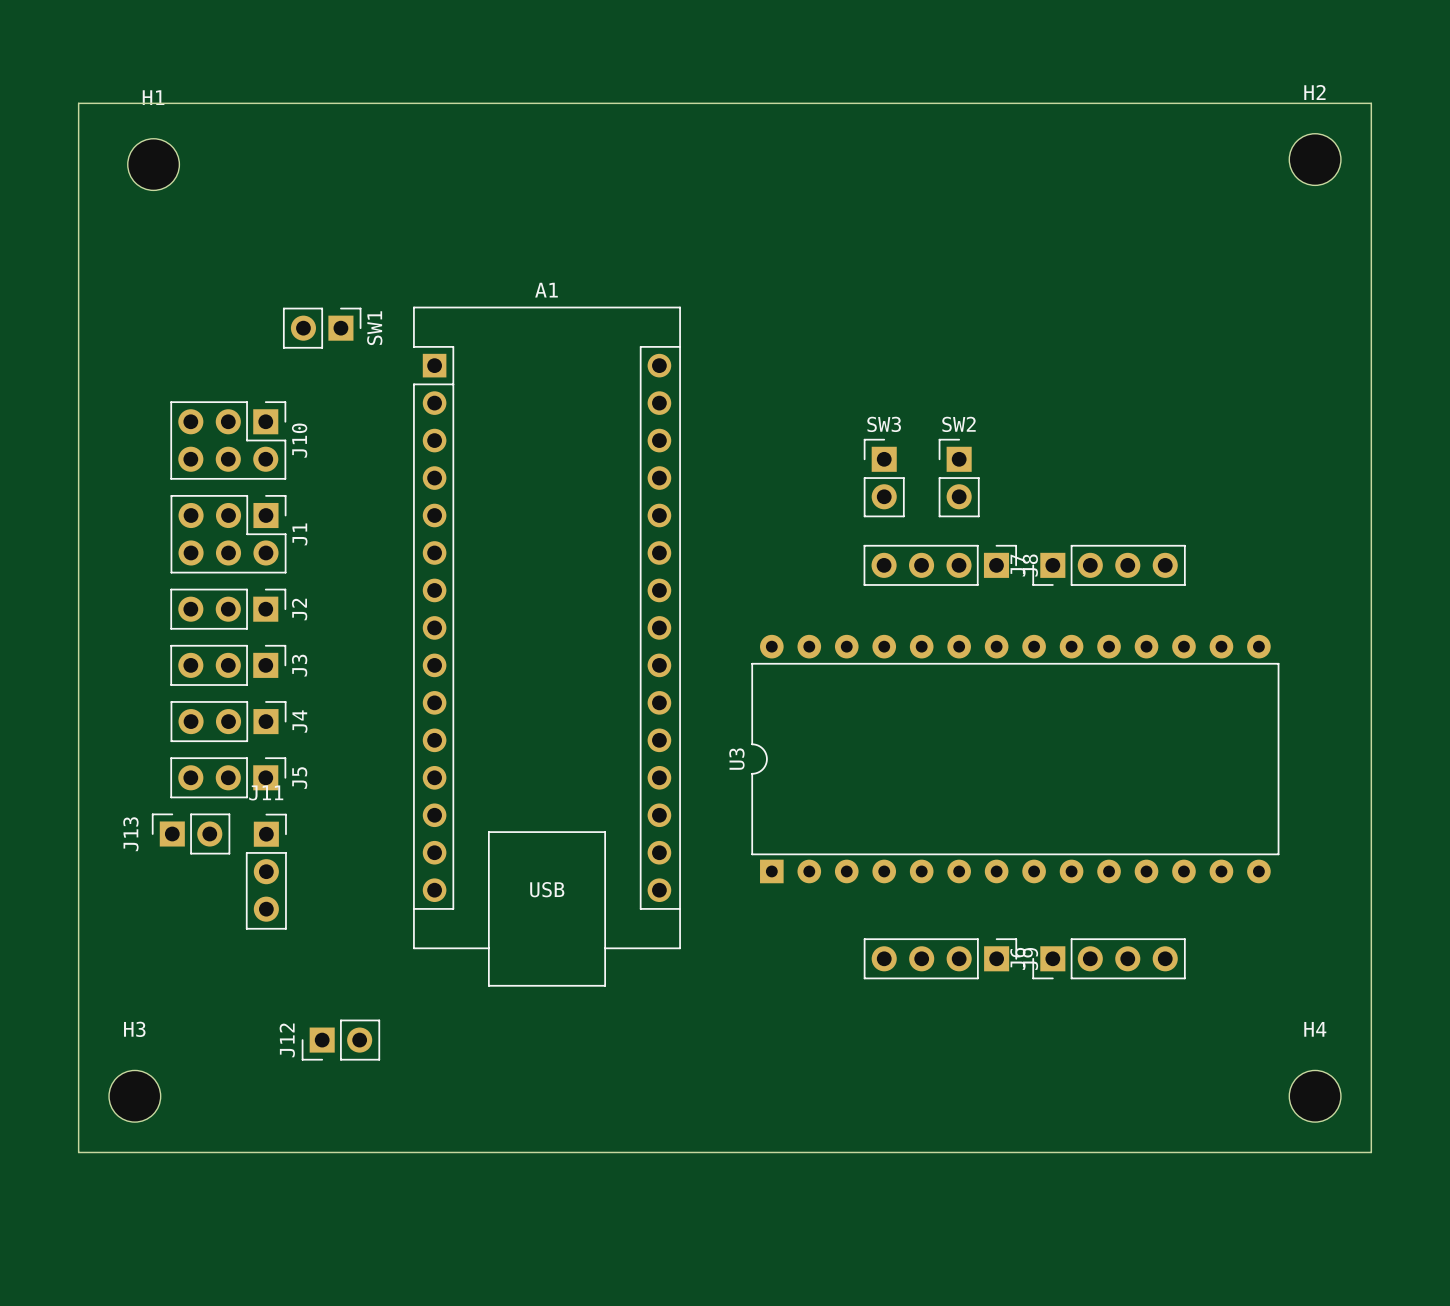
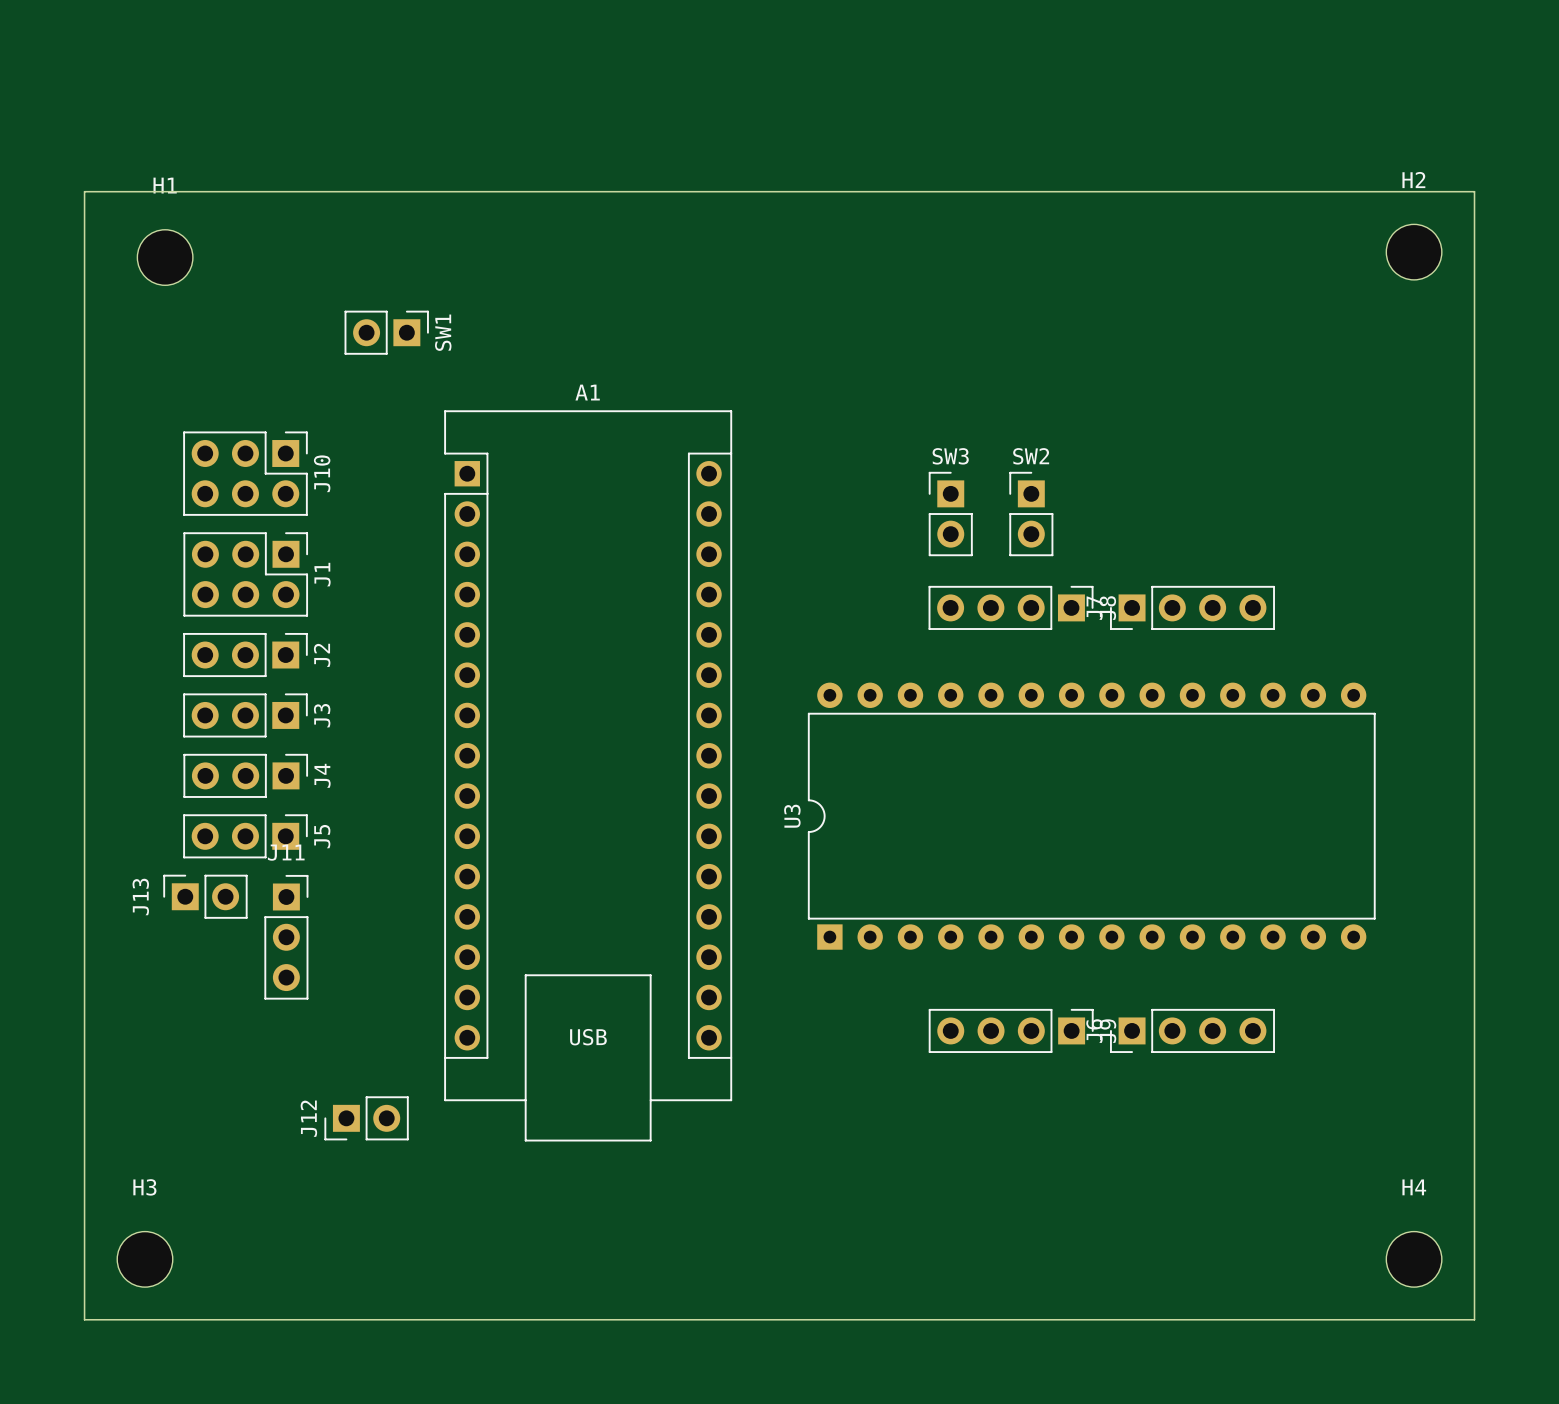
H2 position: (1315, 159) -> (1414, 252)
H1 position: (153, 164) -> (165, 257)
board edge: (78, 178) (78, 103) (1371, 103) (1371, 178) -> (84, 191) (1474, 191)
SW1 position: (322, 328) -> (386, 332)
A1 position: (547, 646) -> (588, 775)
H3 position: (134, 1096) -> (144, 1259)
H4 position: (1315, 1096) -> (1414, 1259)
board edge: (78, 1152) (1371, 1152) -> (84, 1239) (84, 1319) (1474, 1319) (1474, 1239)

